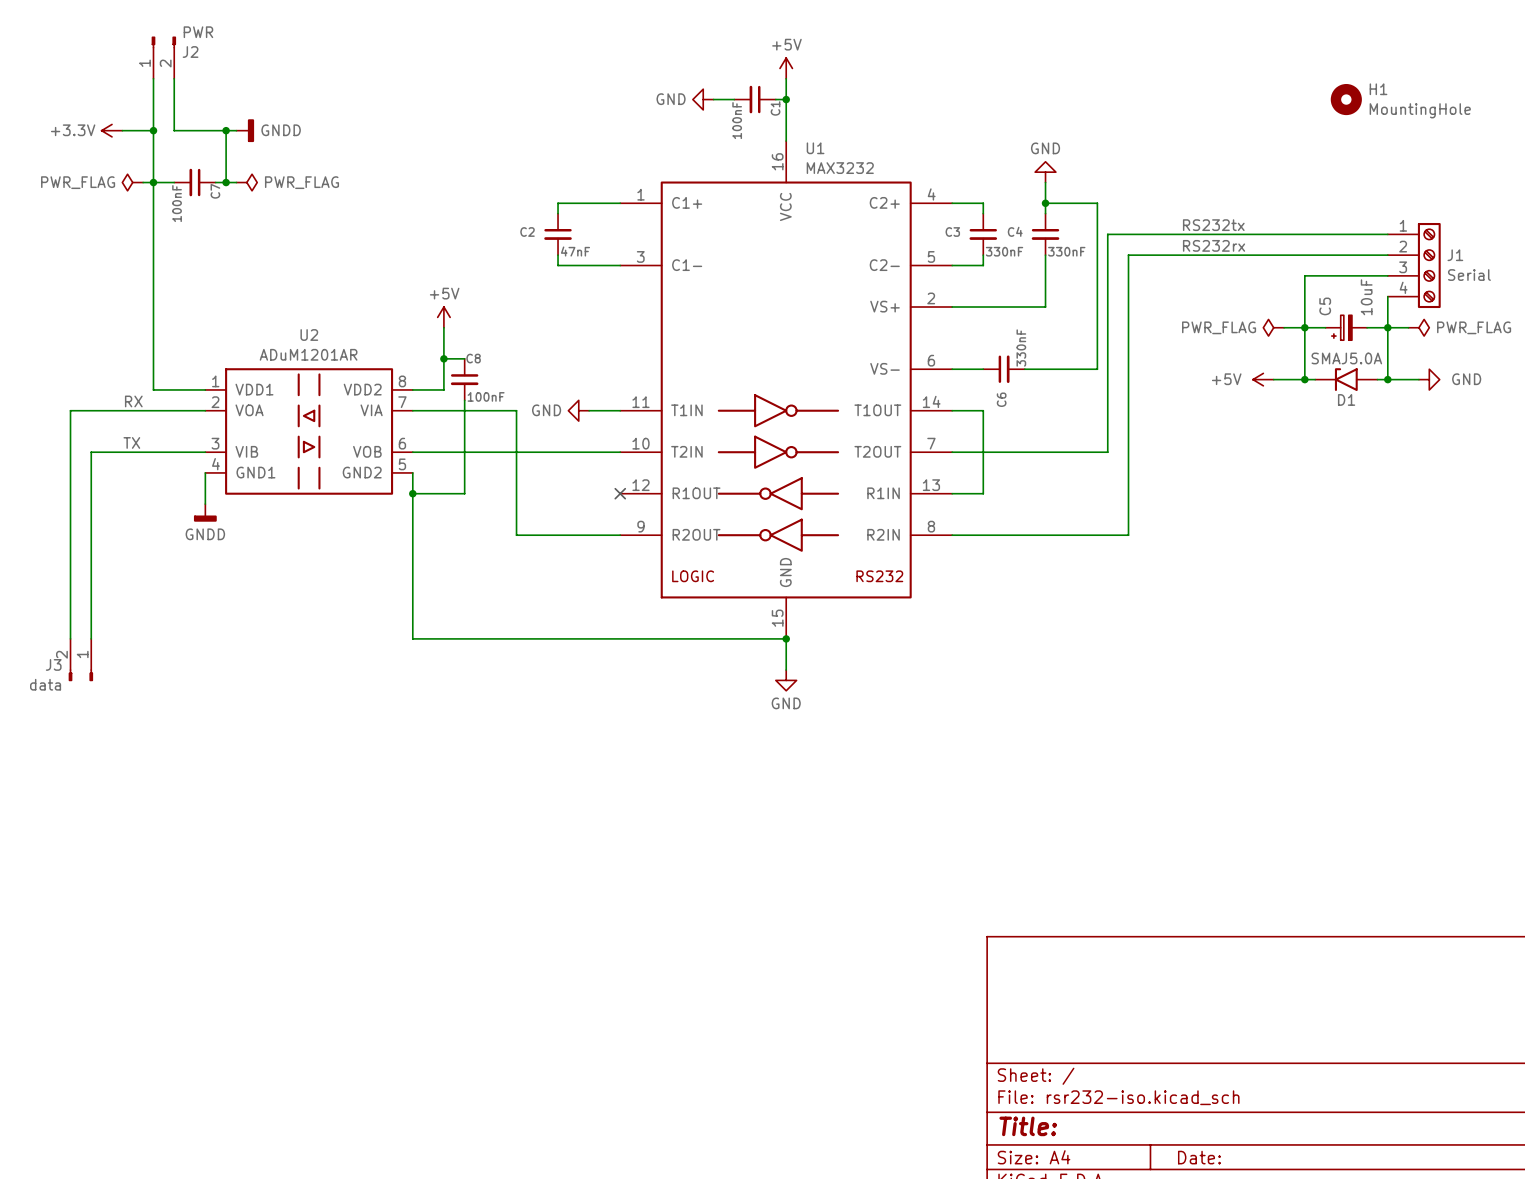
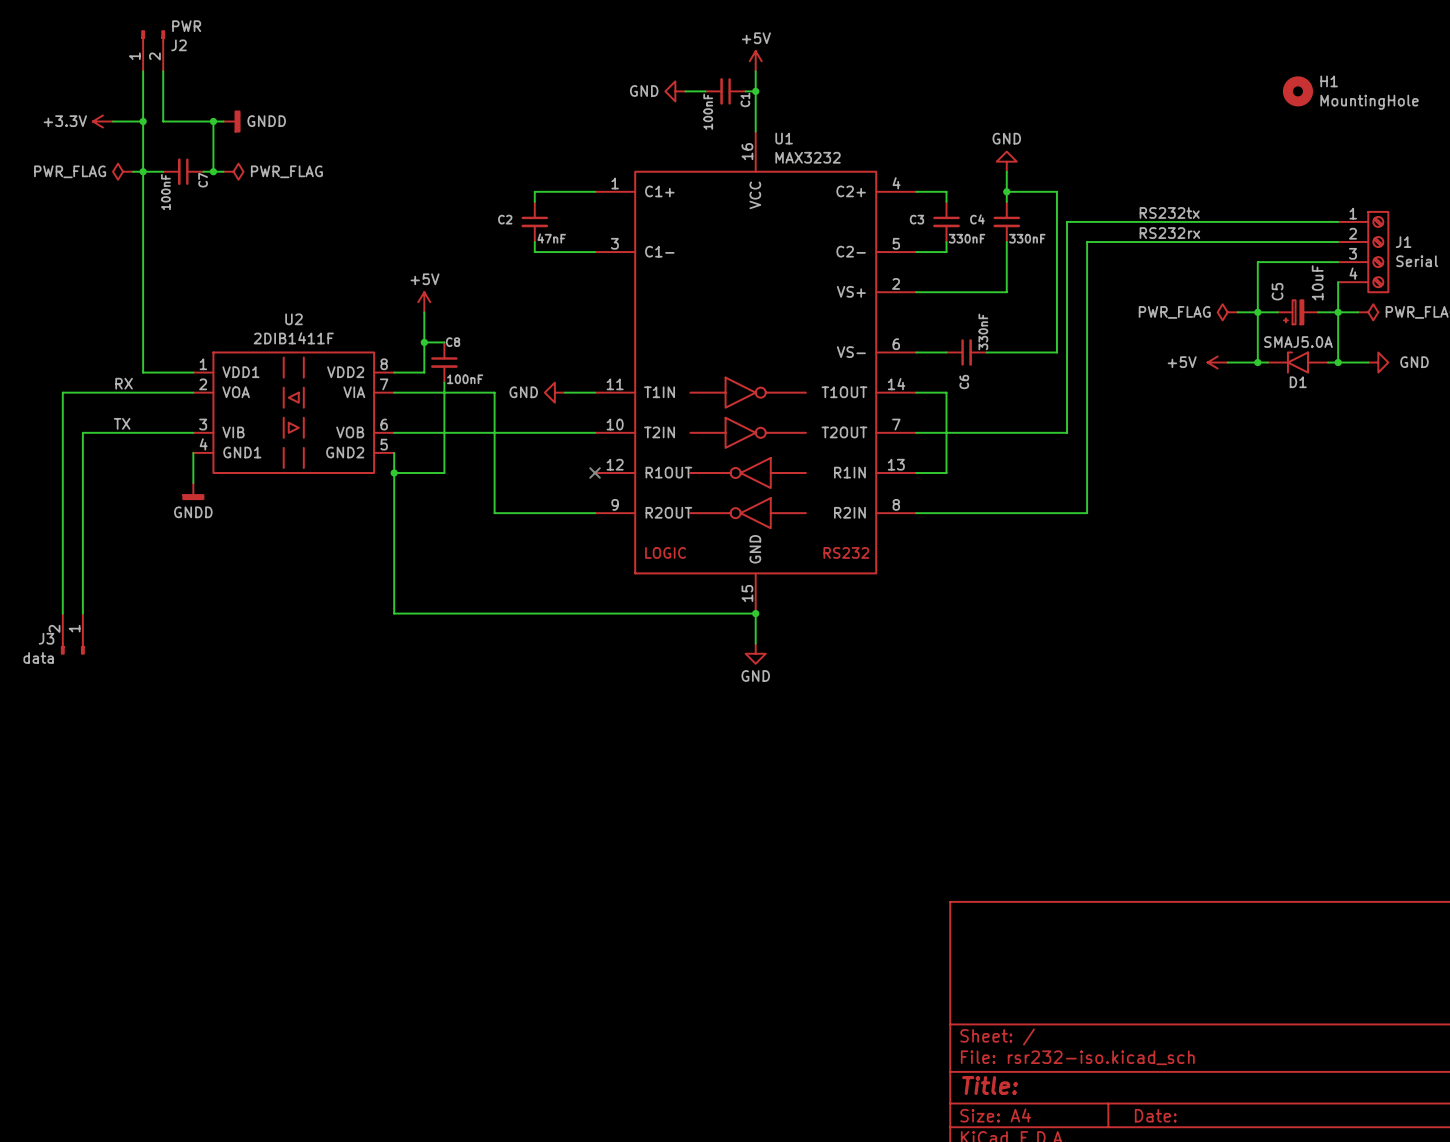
U2 value: ADuM1201AR (308, 354) -> 2DIB1411F (293, 338)

